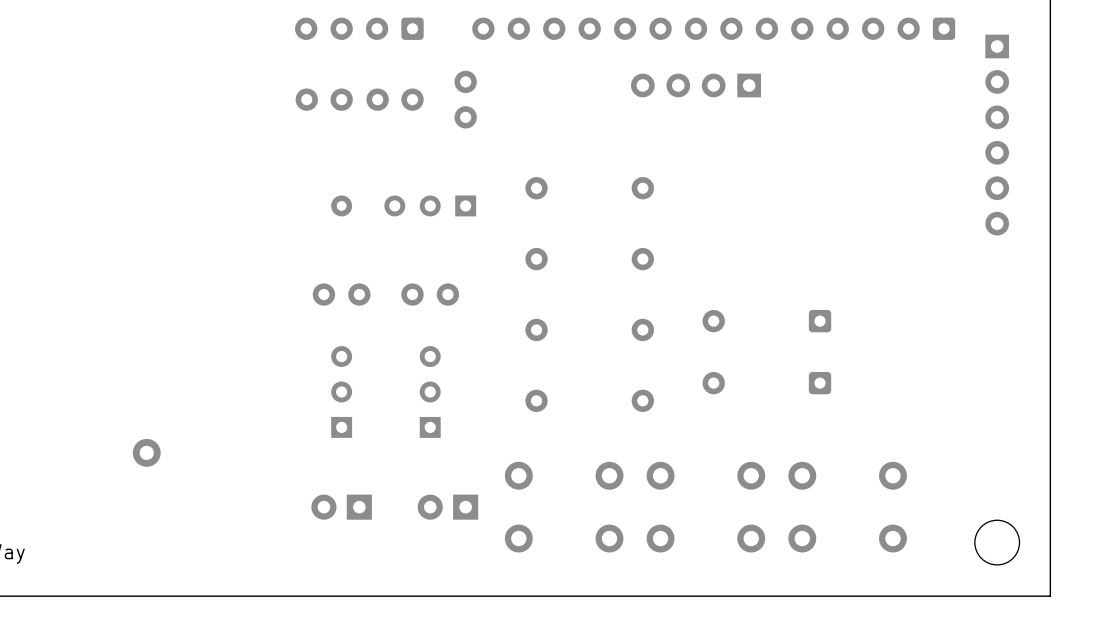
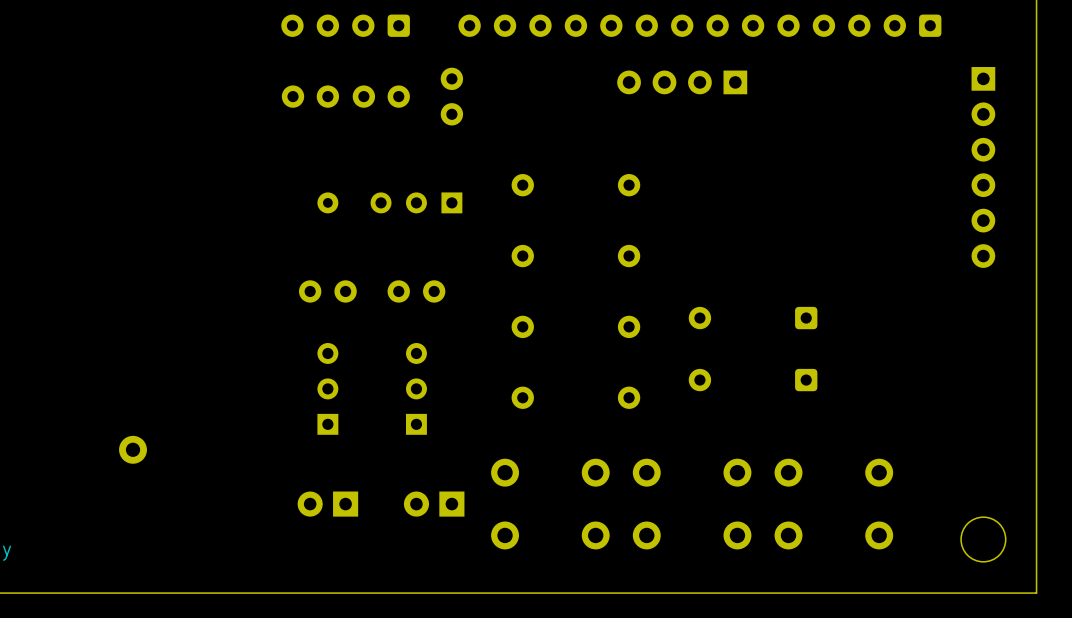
part position: (997, 135) -> (983, 167)

